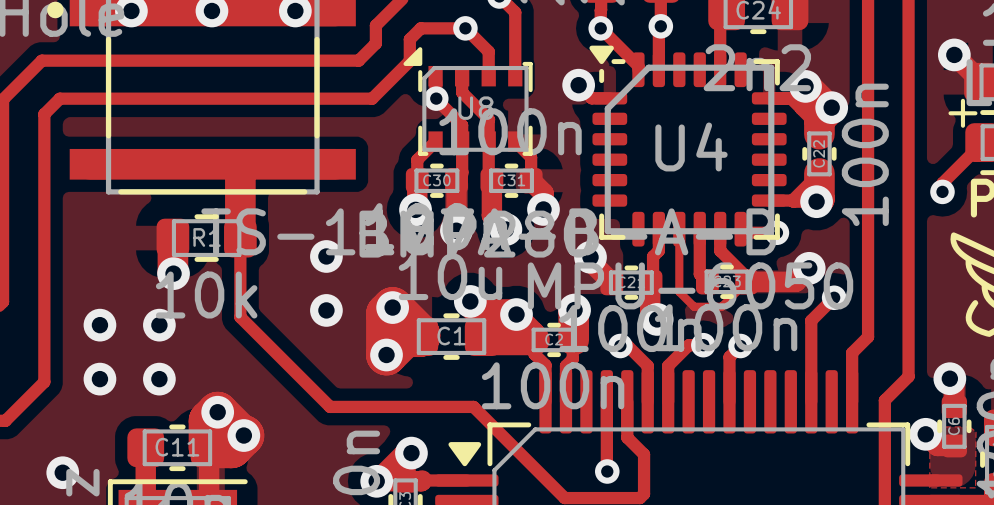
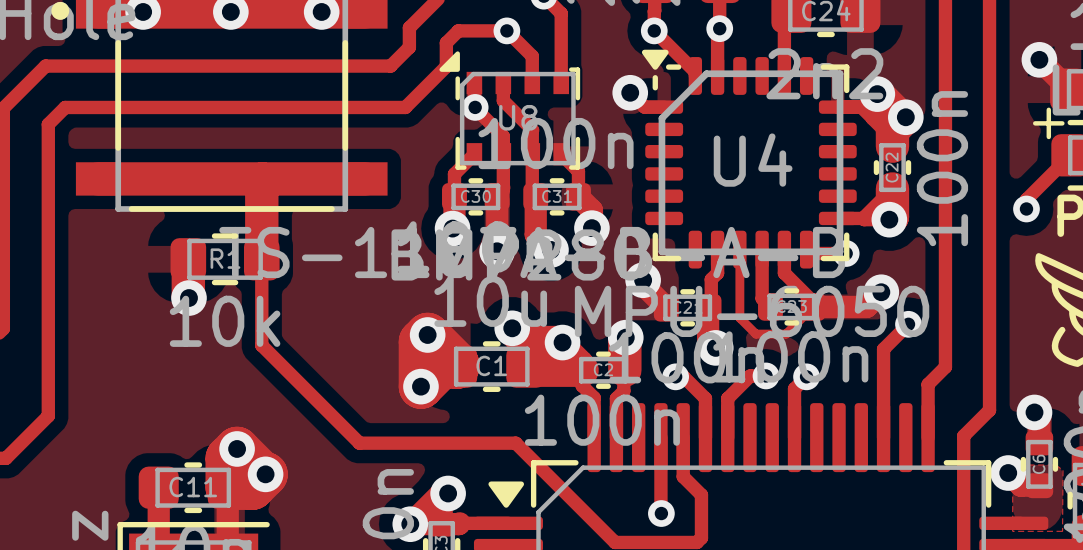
via: (326, 256) -> none
via: (326, 310) -> none
via: (99, 325) -> none
via: (159, 325) -> none
via: (99, 379) -> none
via: (159, 379) -> none
via: (62, 472) -> none

